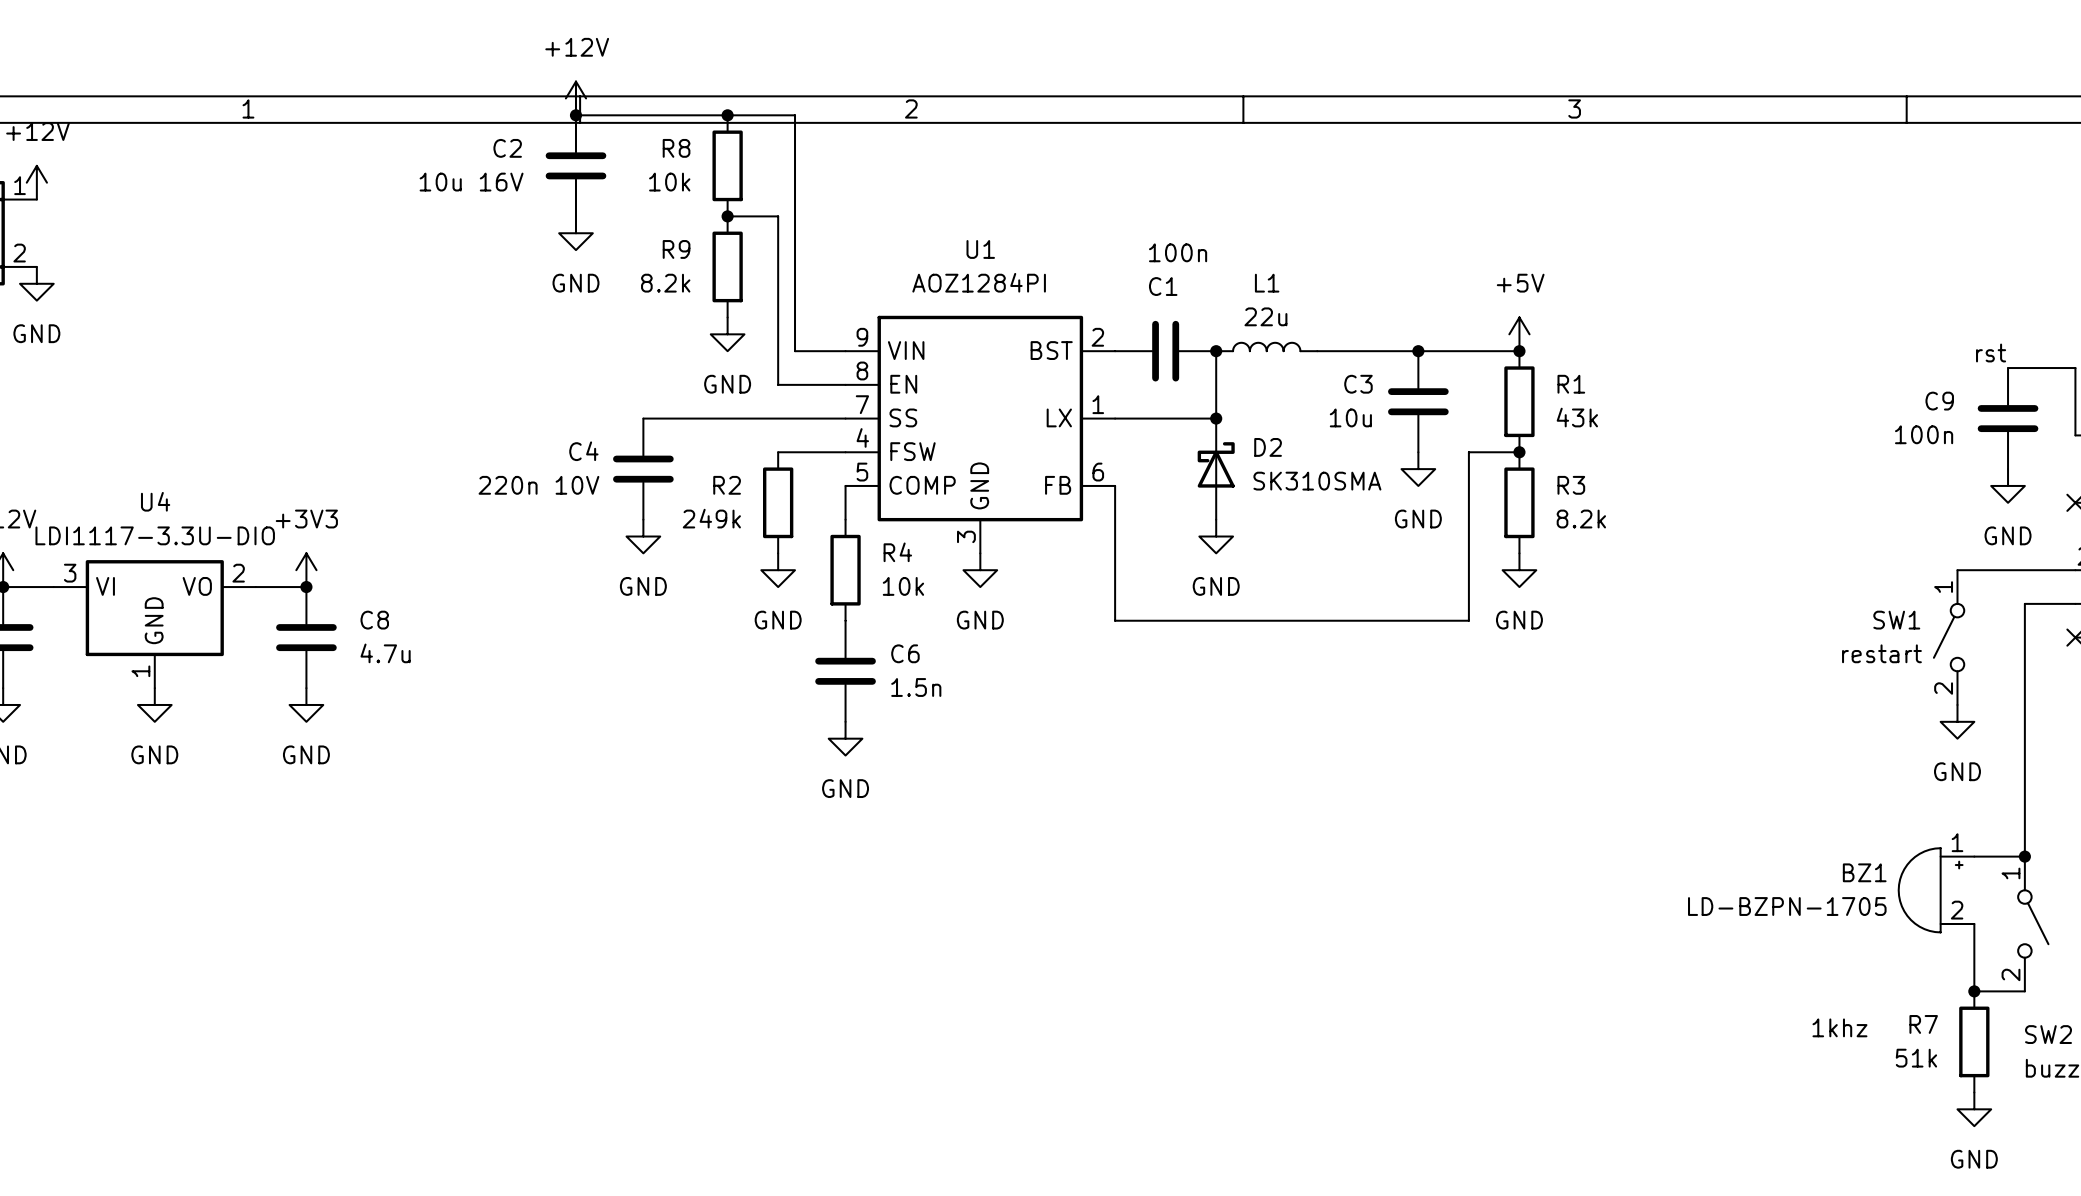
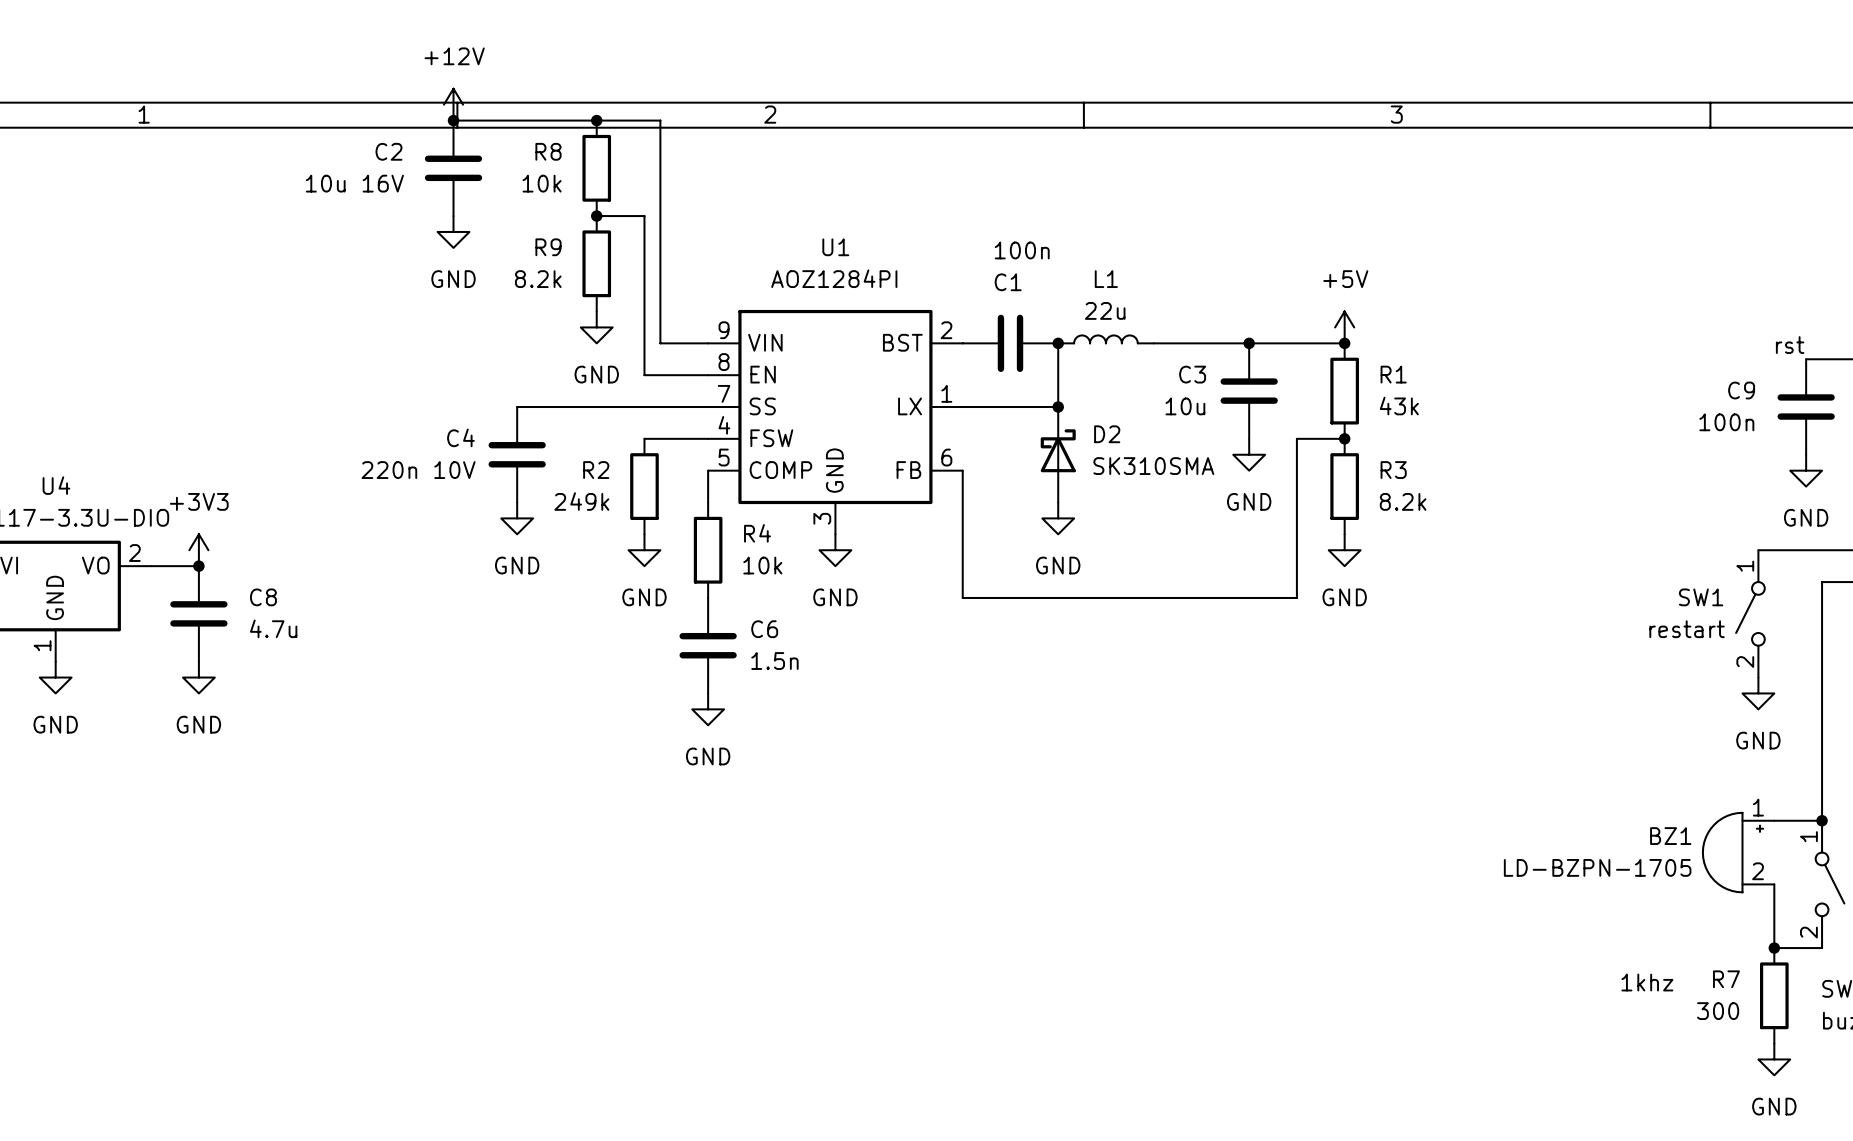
R7 value: 51k (1916, 1058) -> 300 (1718, 1011)

